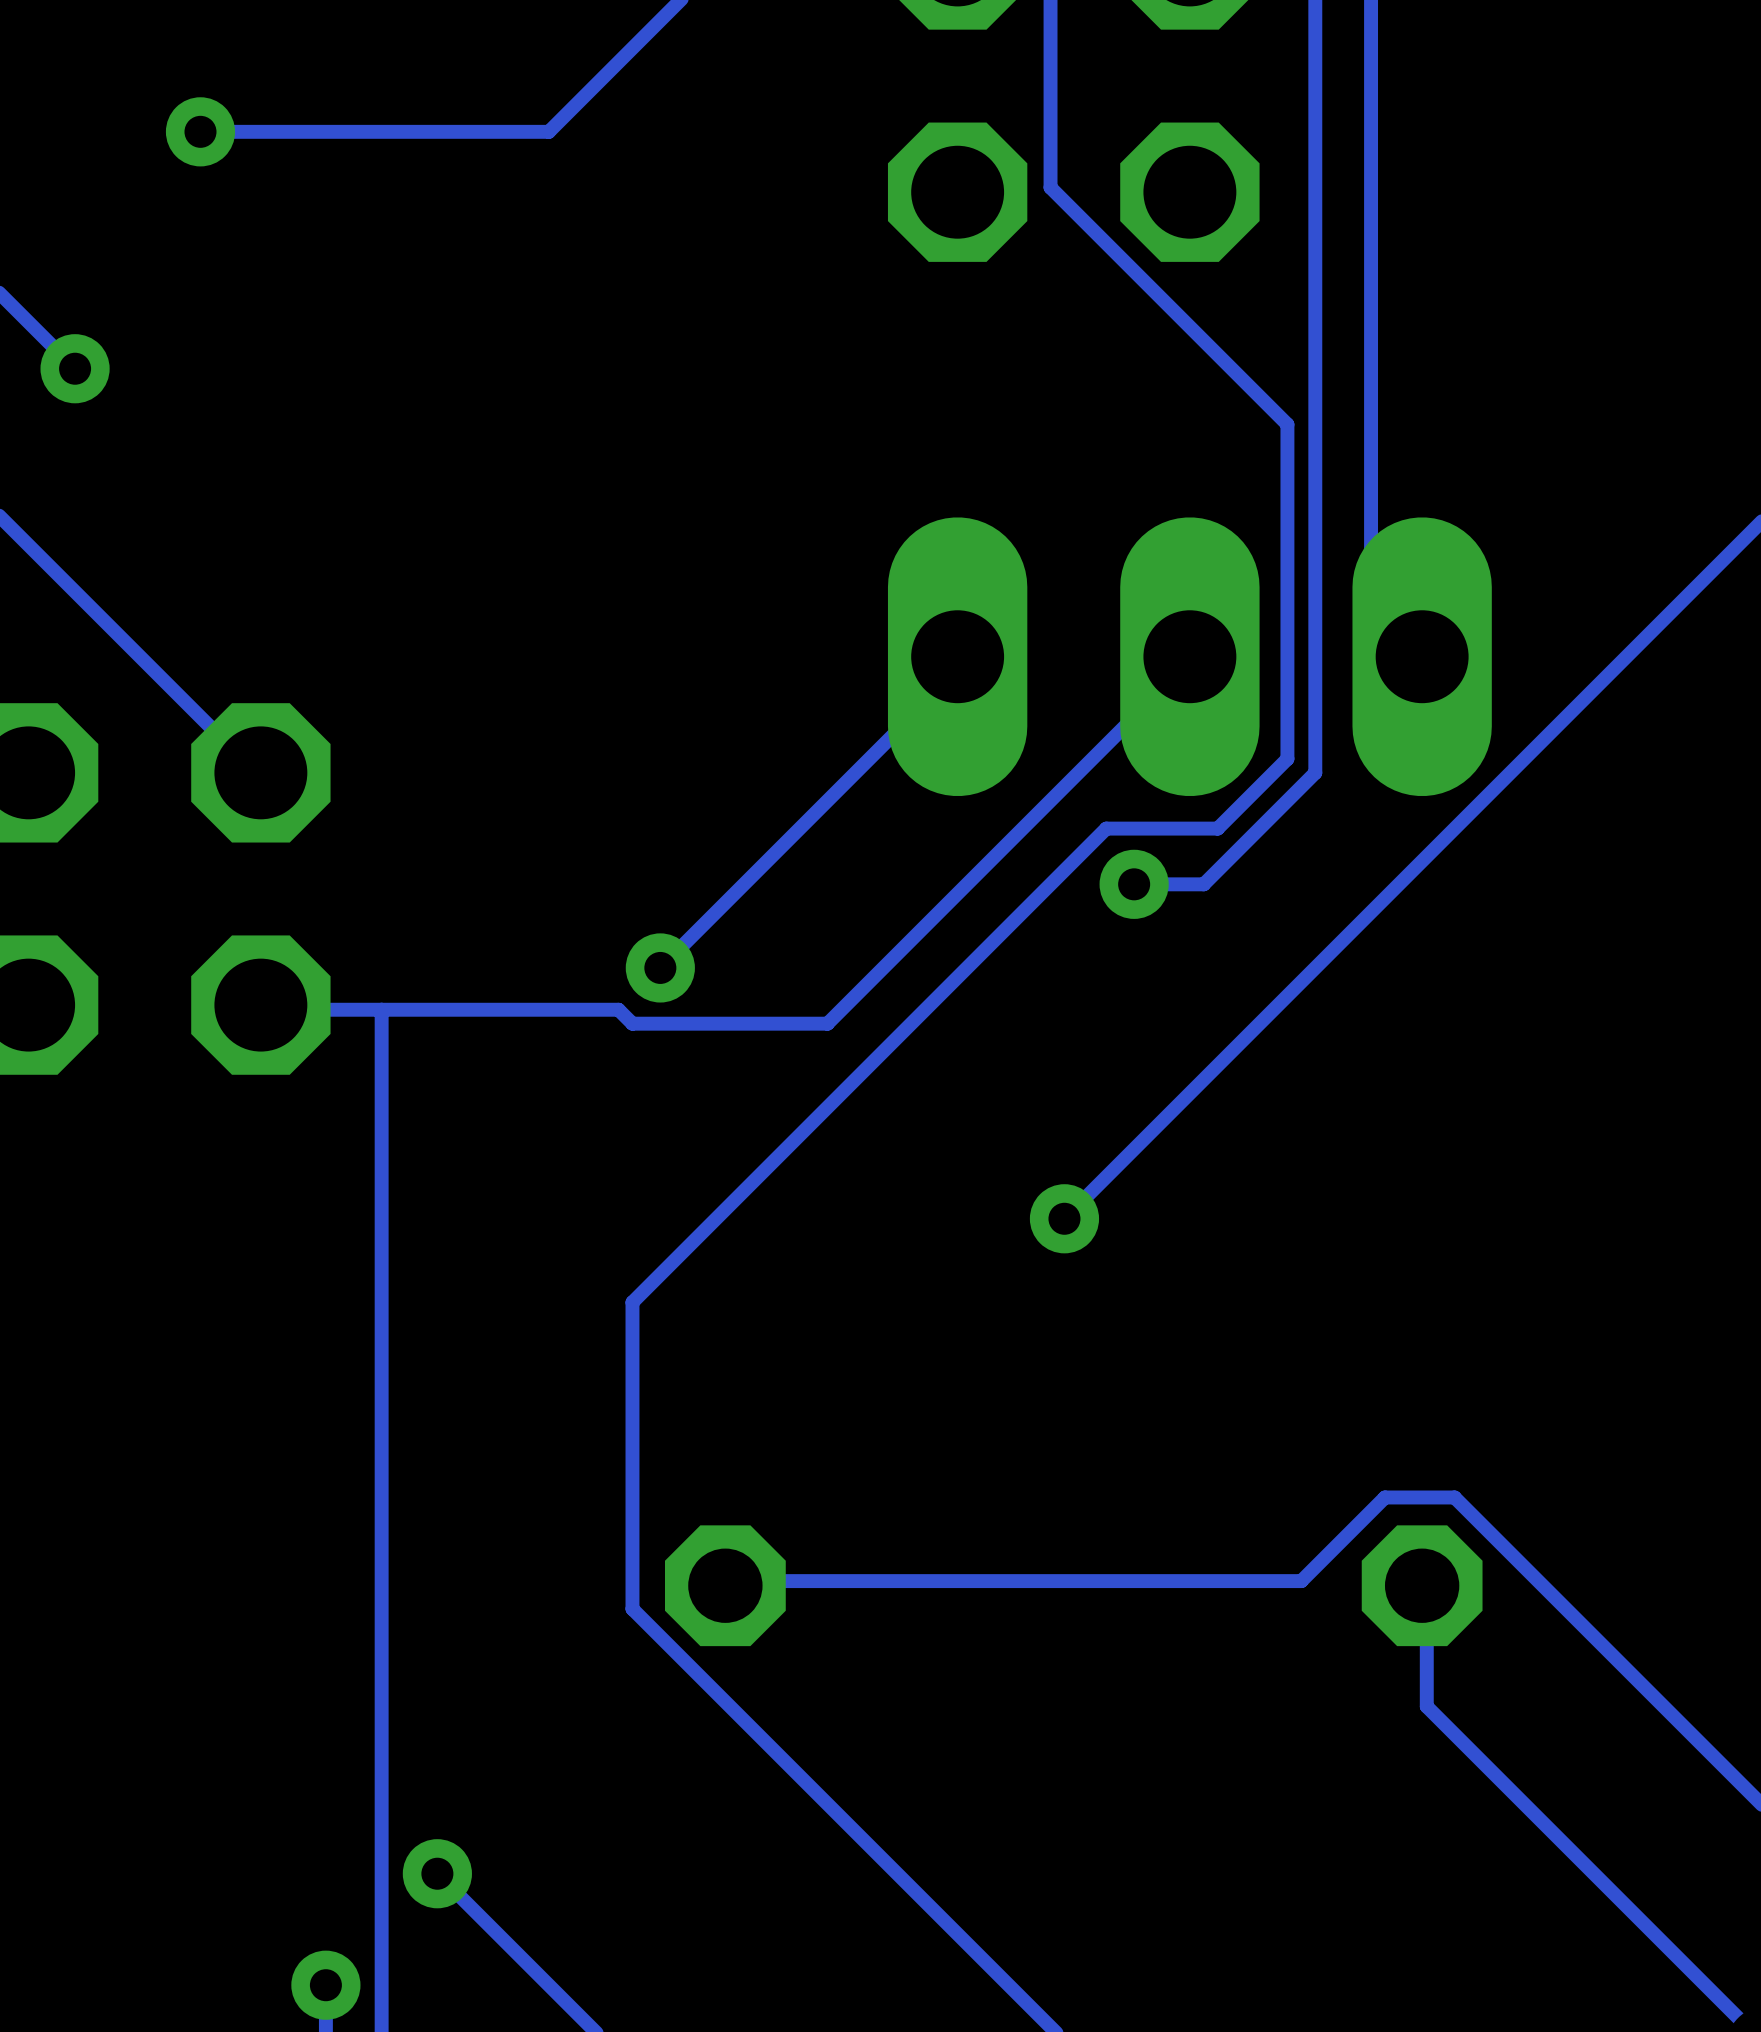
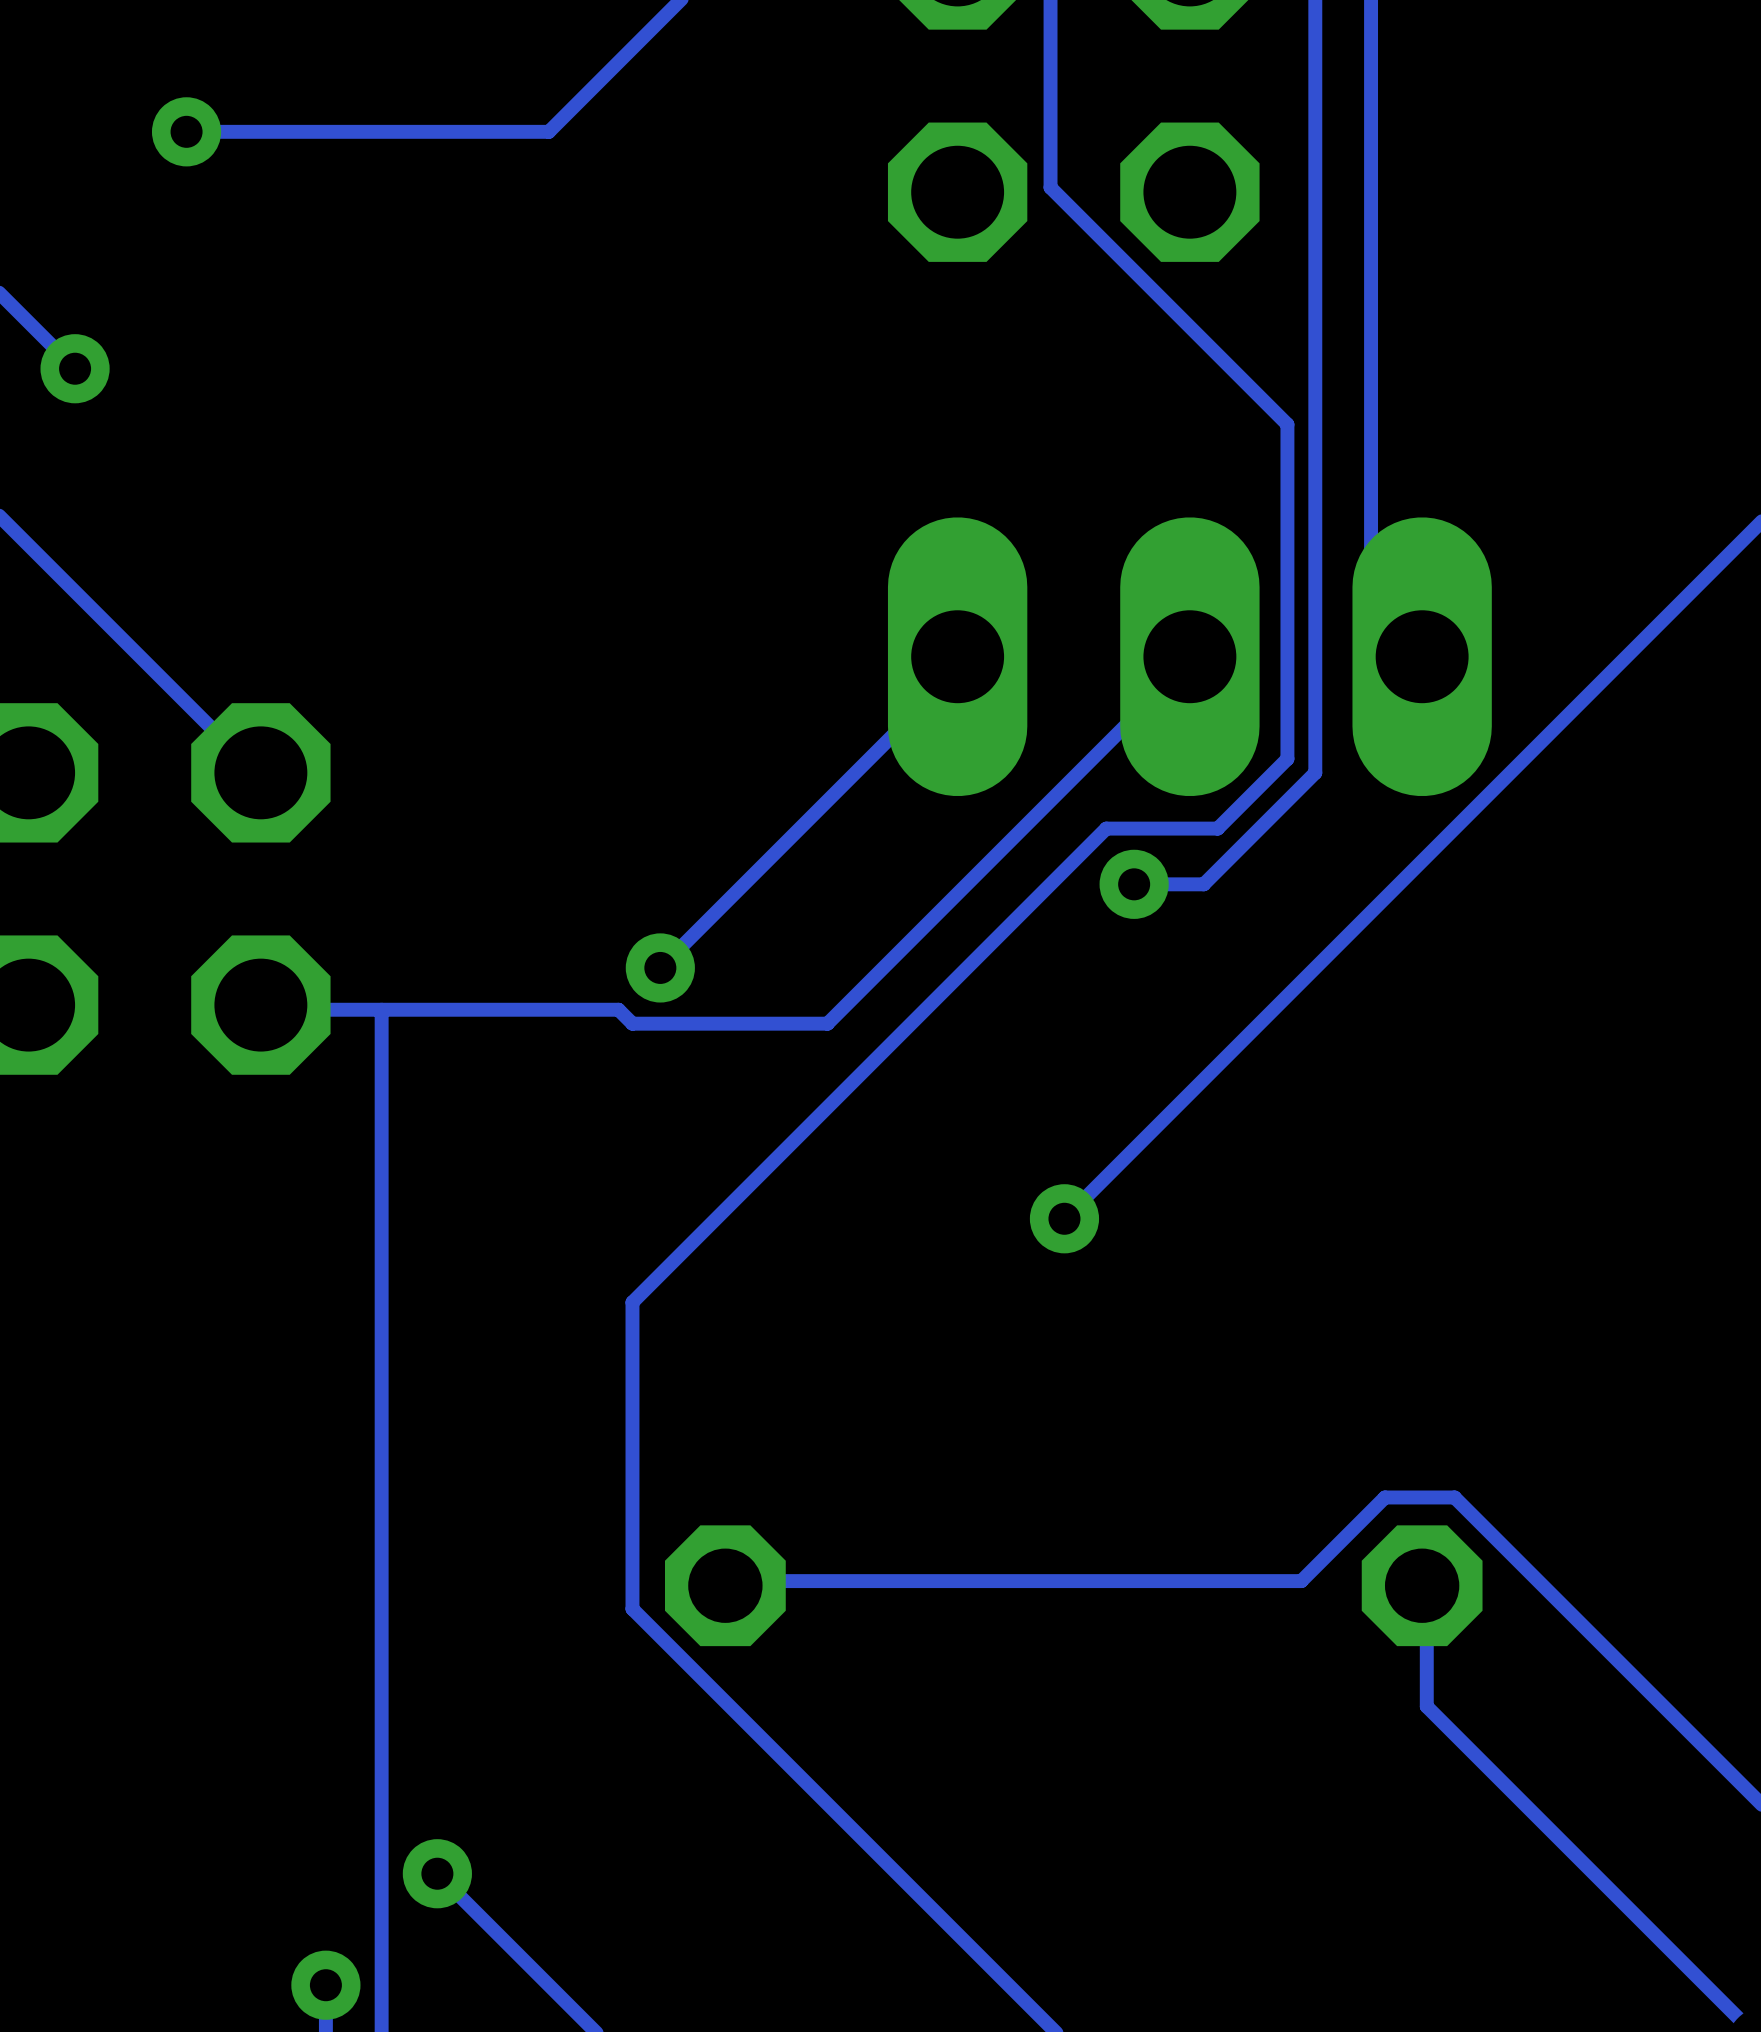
via position: (200, 131) -> (186, 131)

